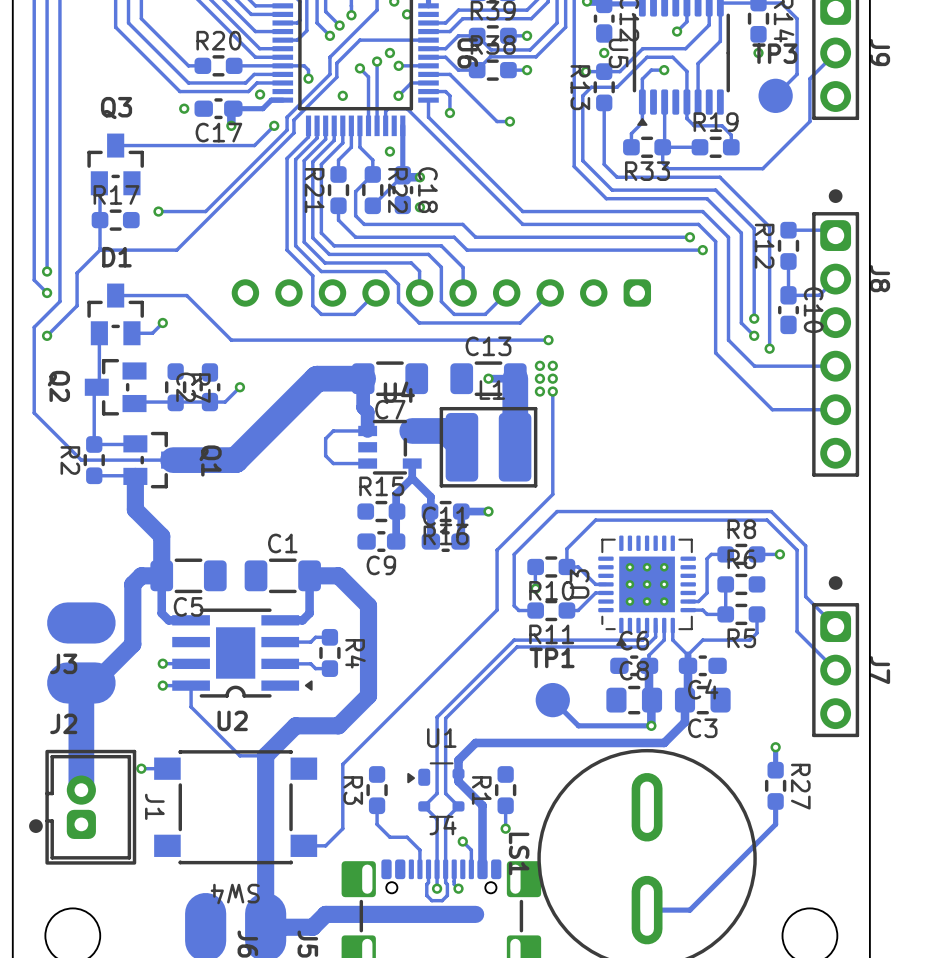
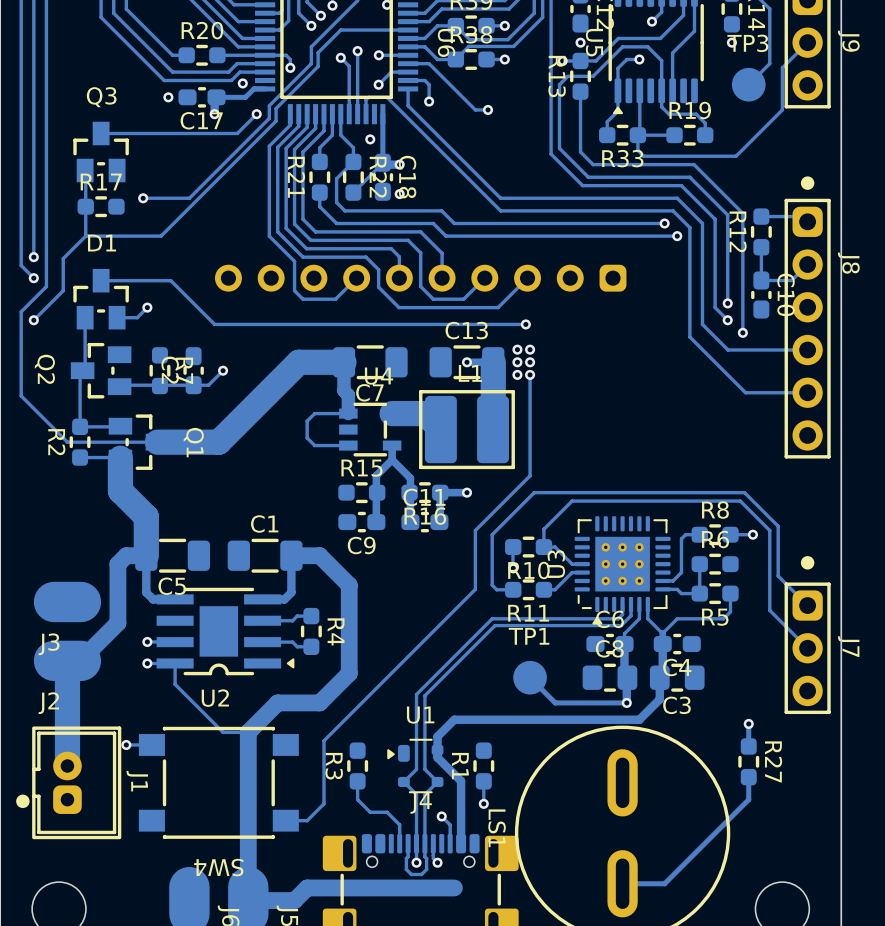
via: (389, 52) -> none
via: (342, 95) -> none
track width: thin (135, 476) (135, 509) (161, 536) (161, 575) -> thick (120, 458) (120, 490) (146, 516) (146, 555)

